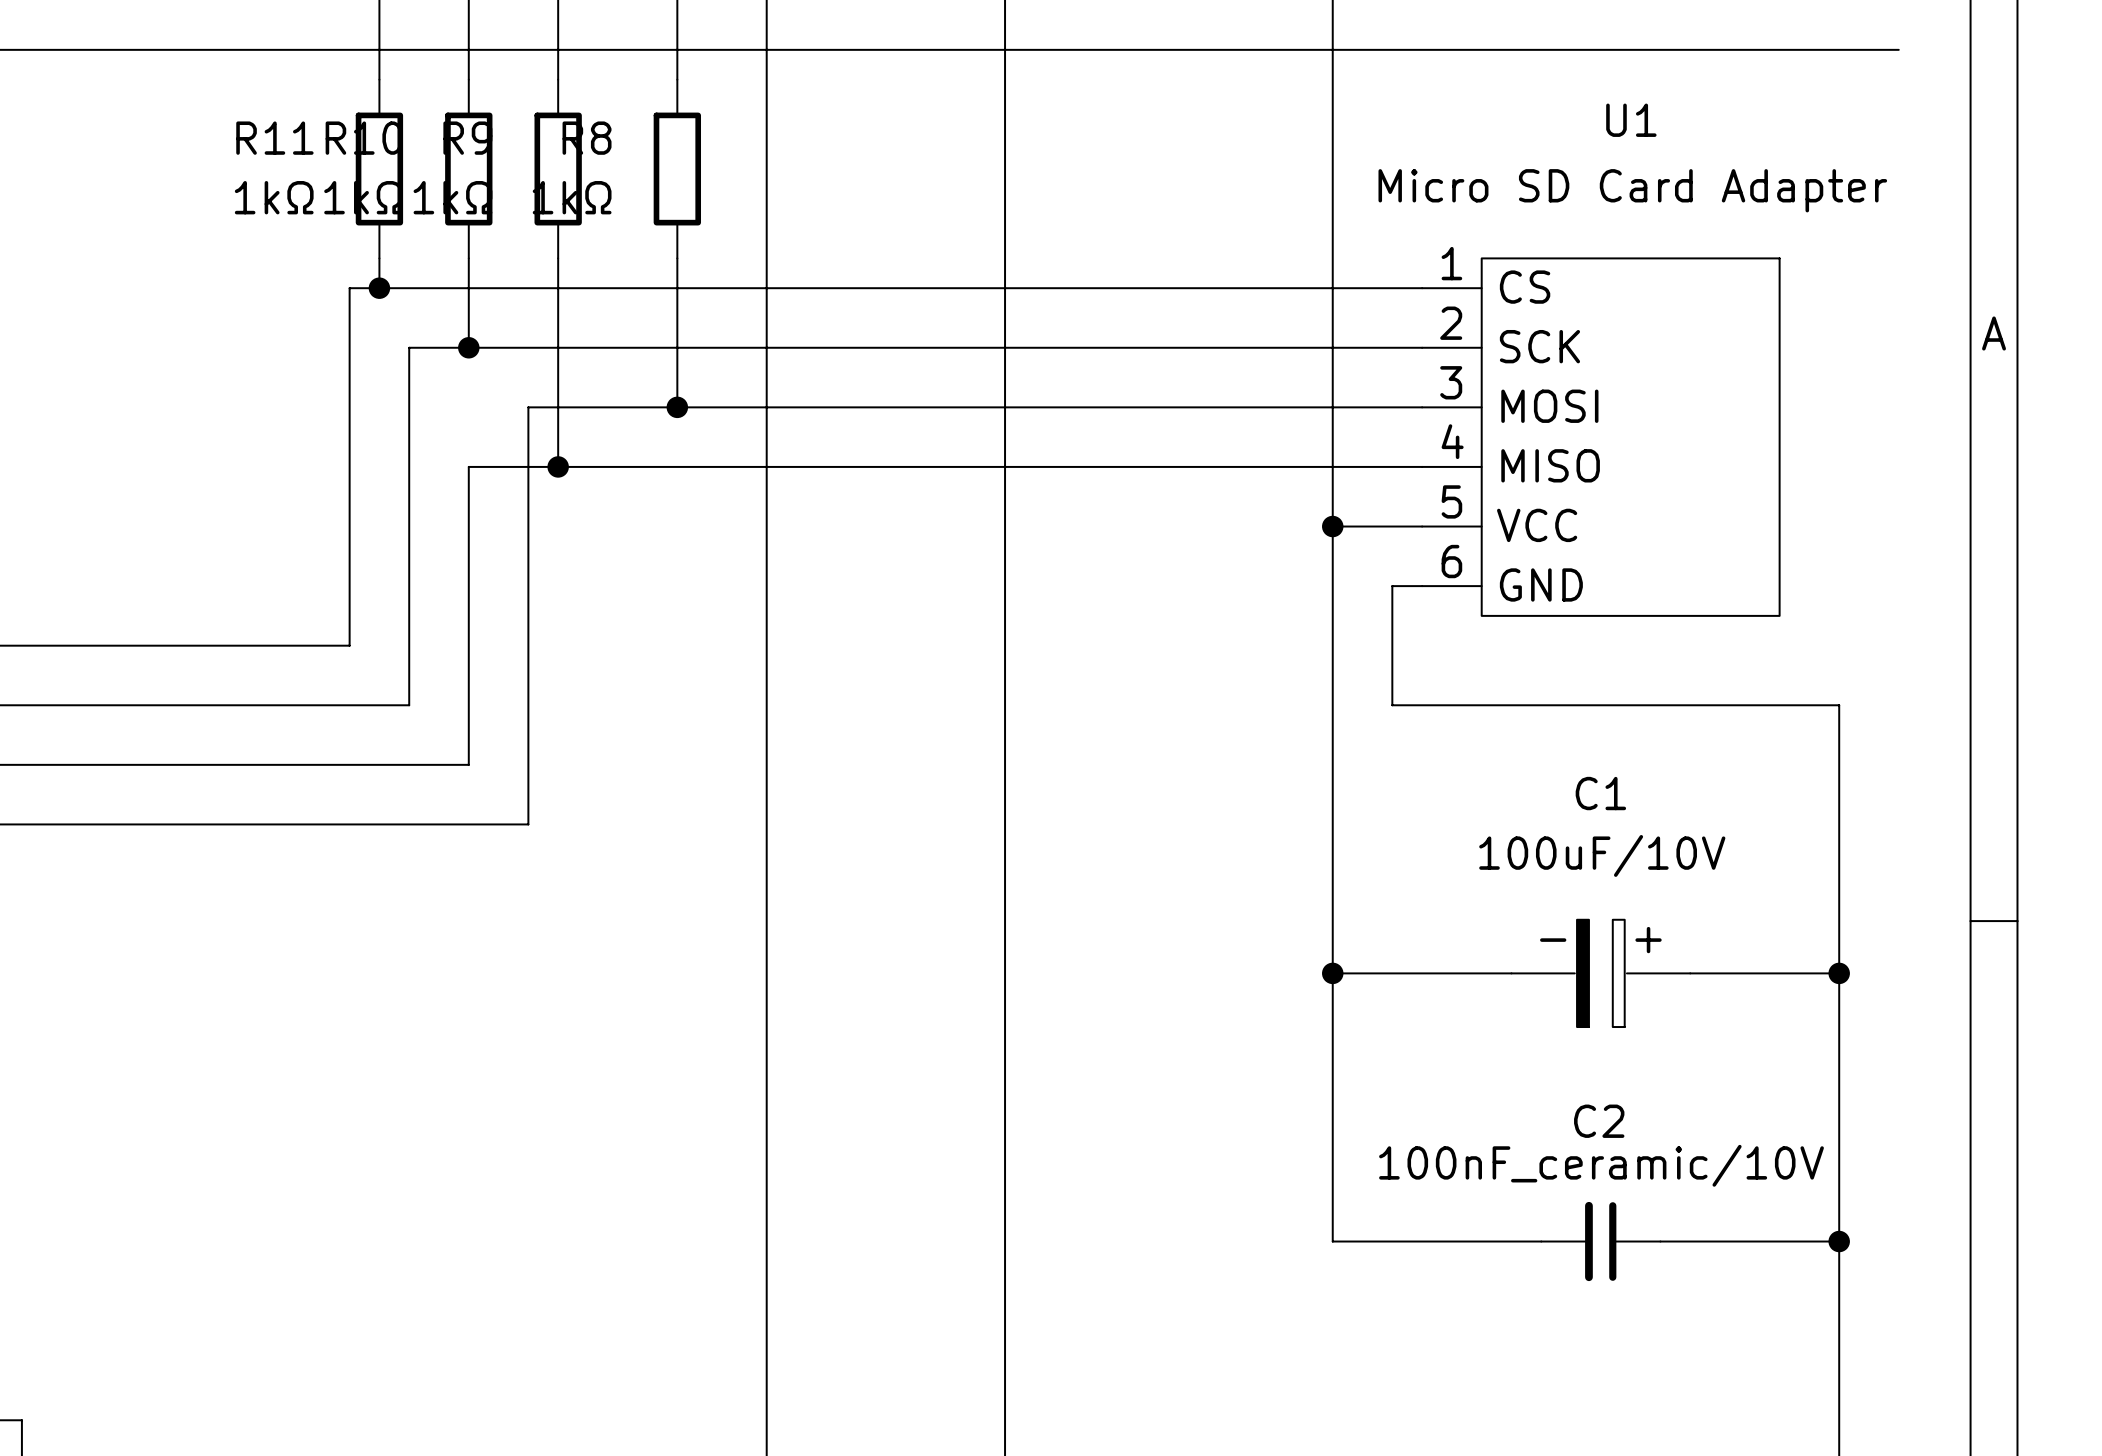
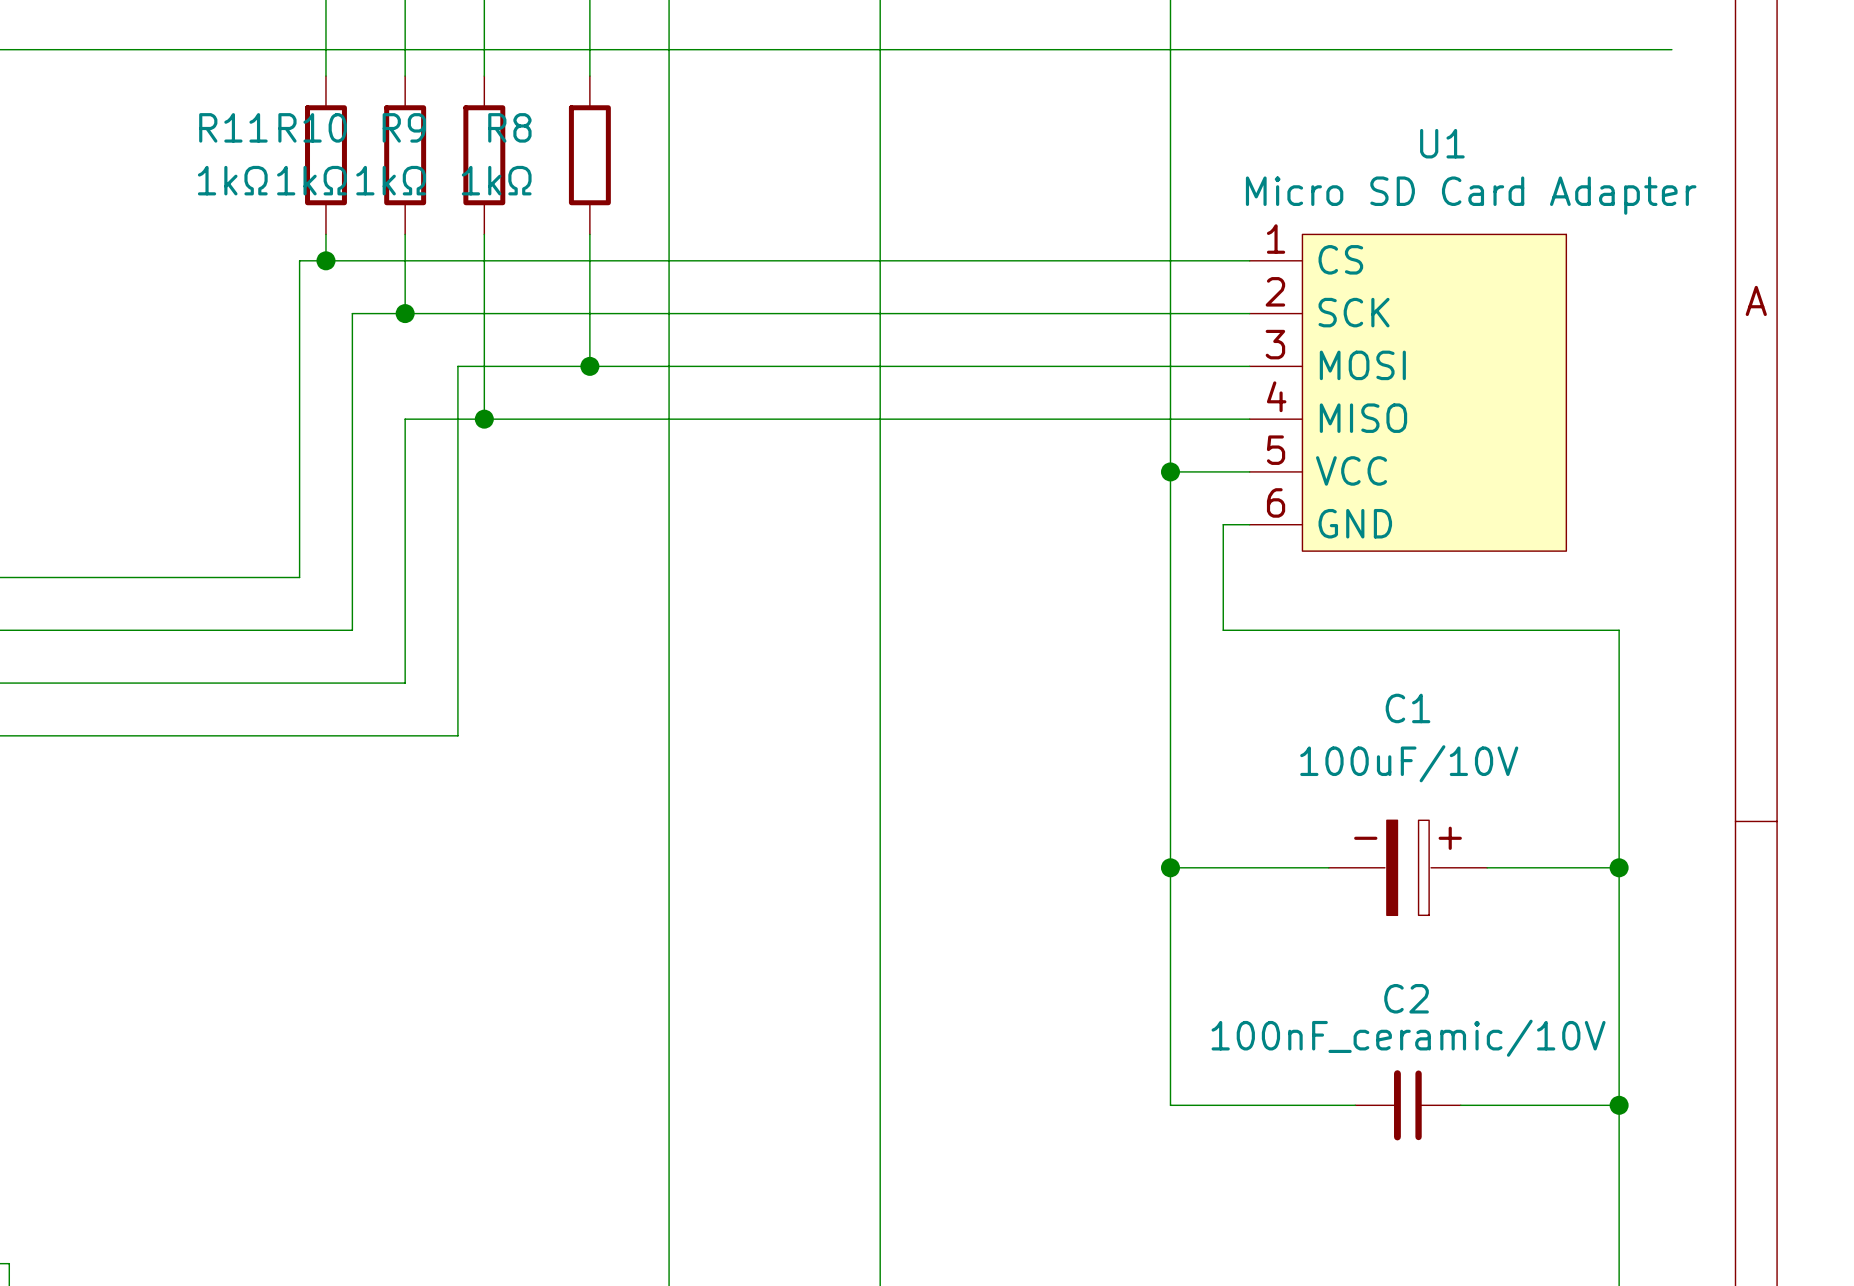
U1 name position: U1 (1631, 120) -> U1 (1442, 143)
U1 value position: Micro SD Card Adapter (1632, 190) -> Micro SD Card Adapter (1471, 195)

